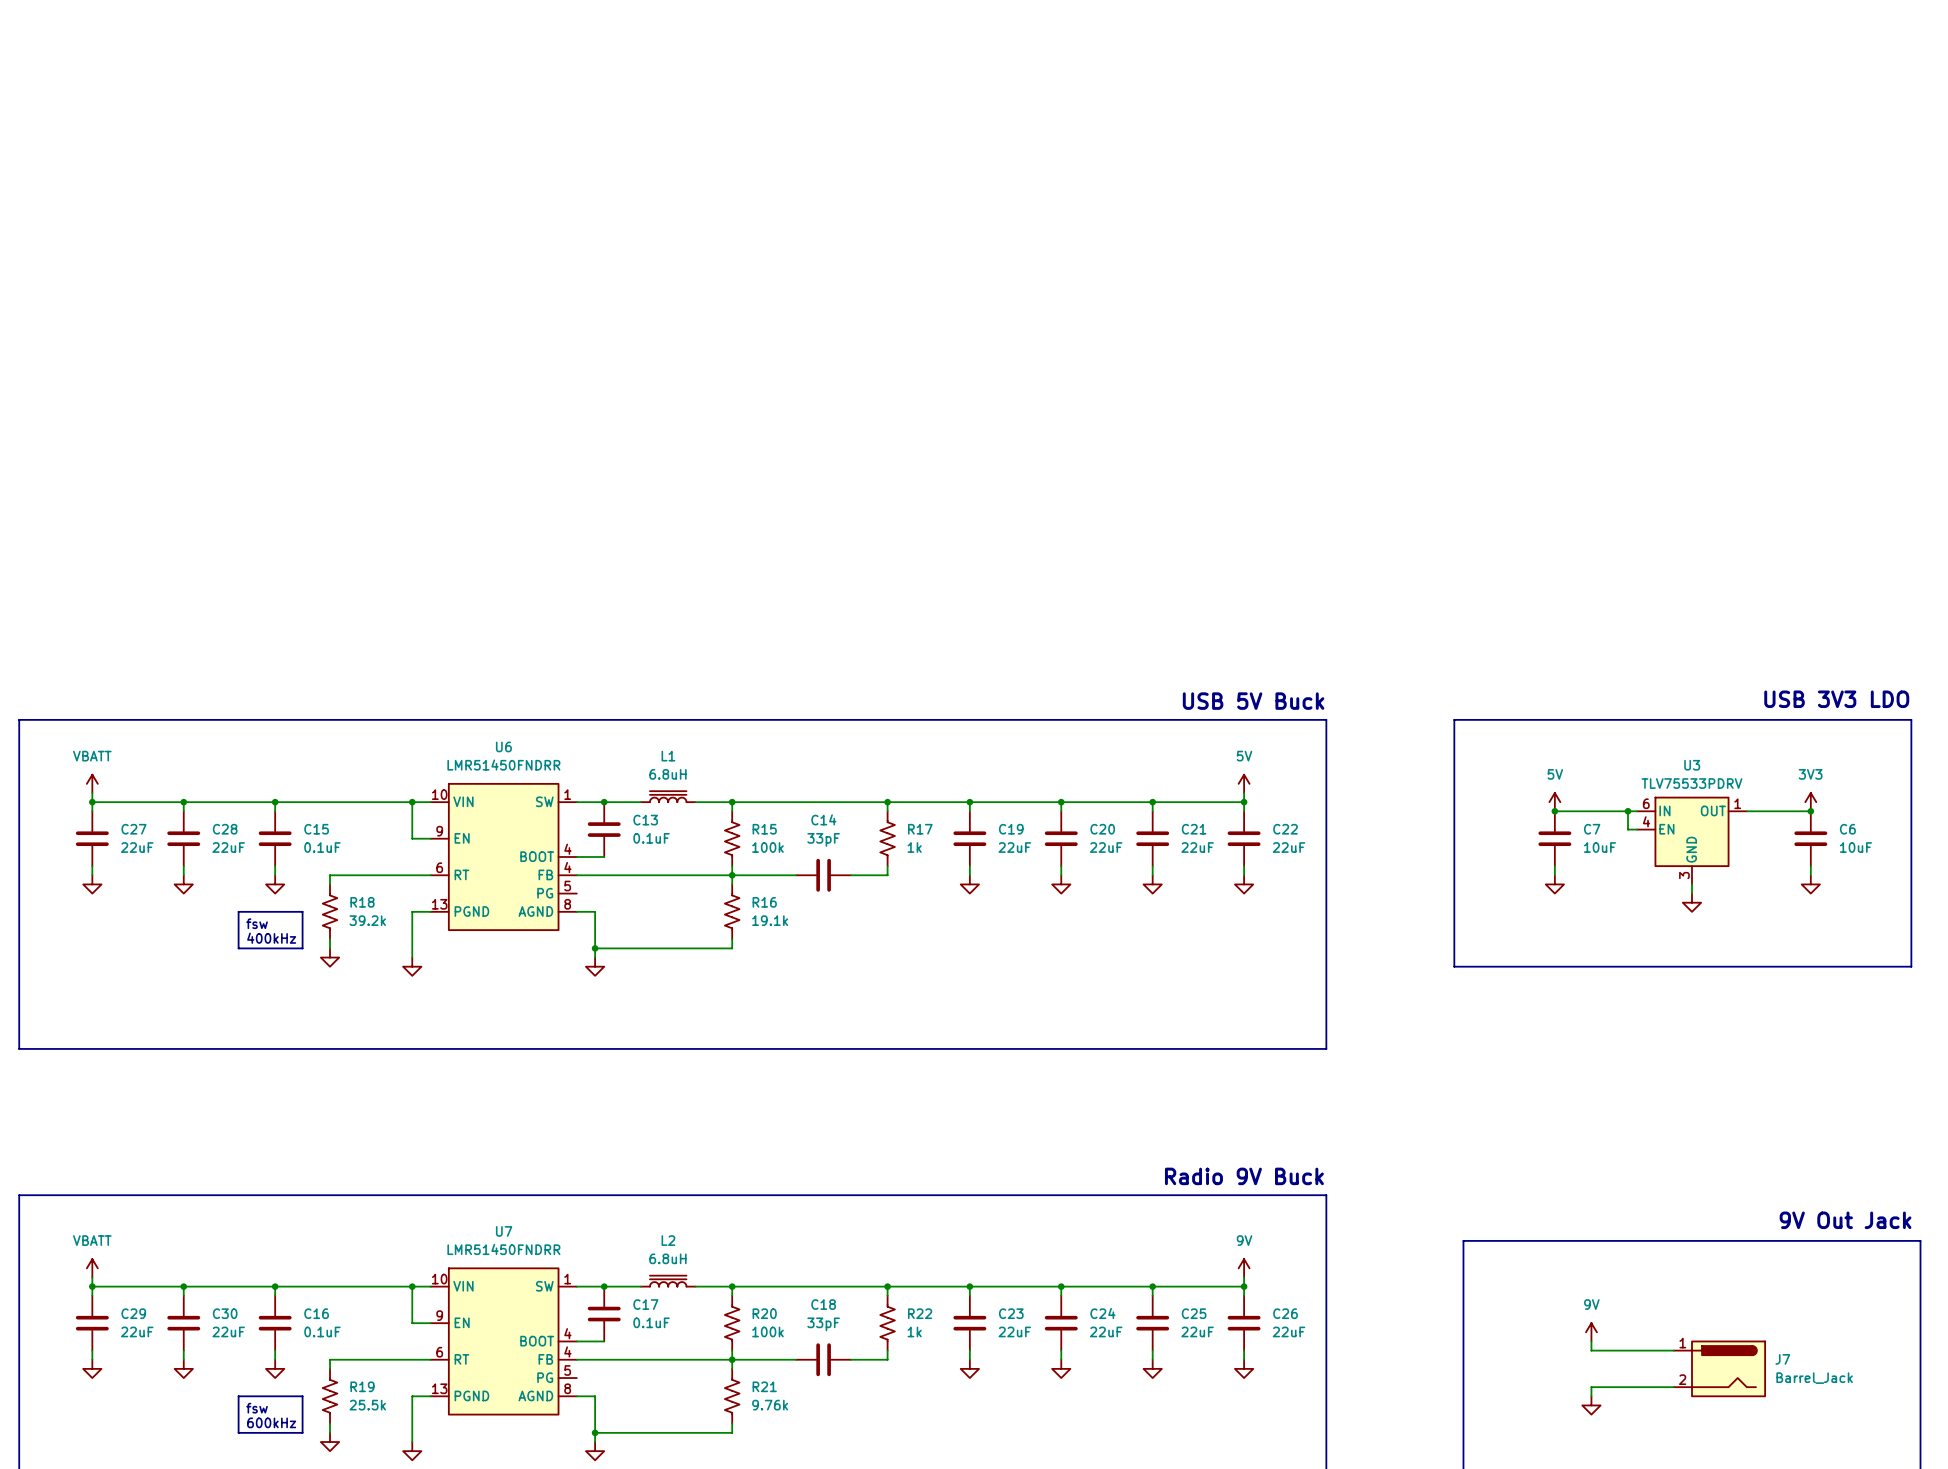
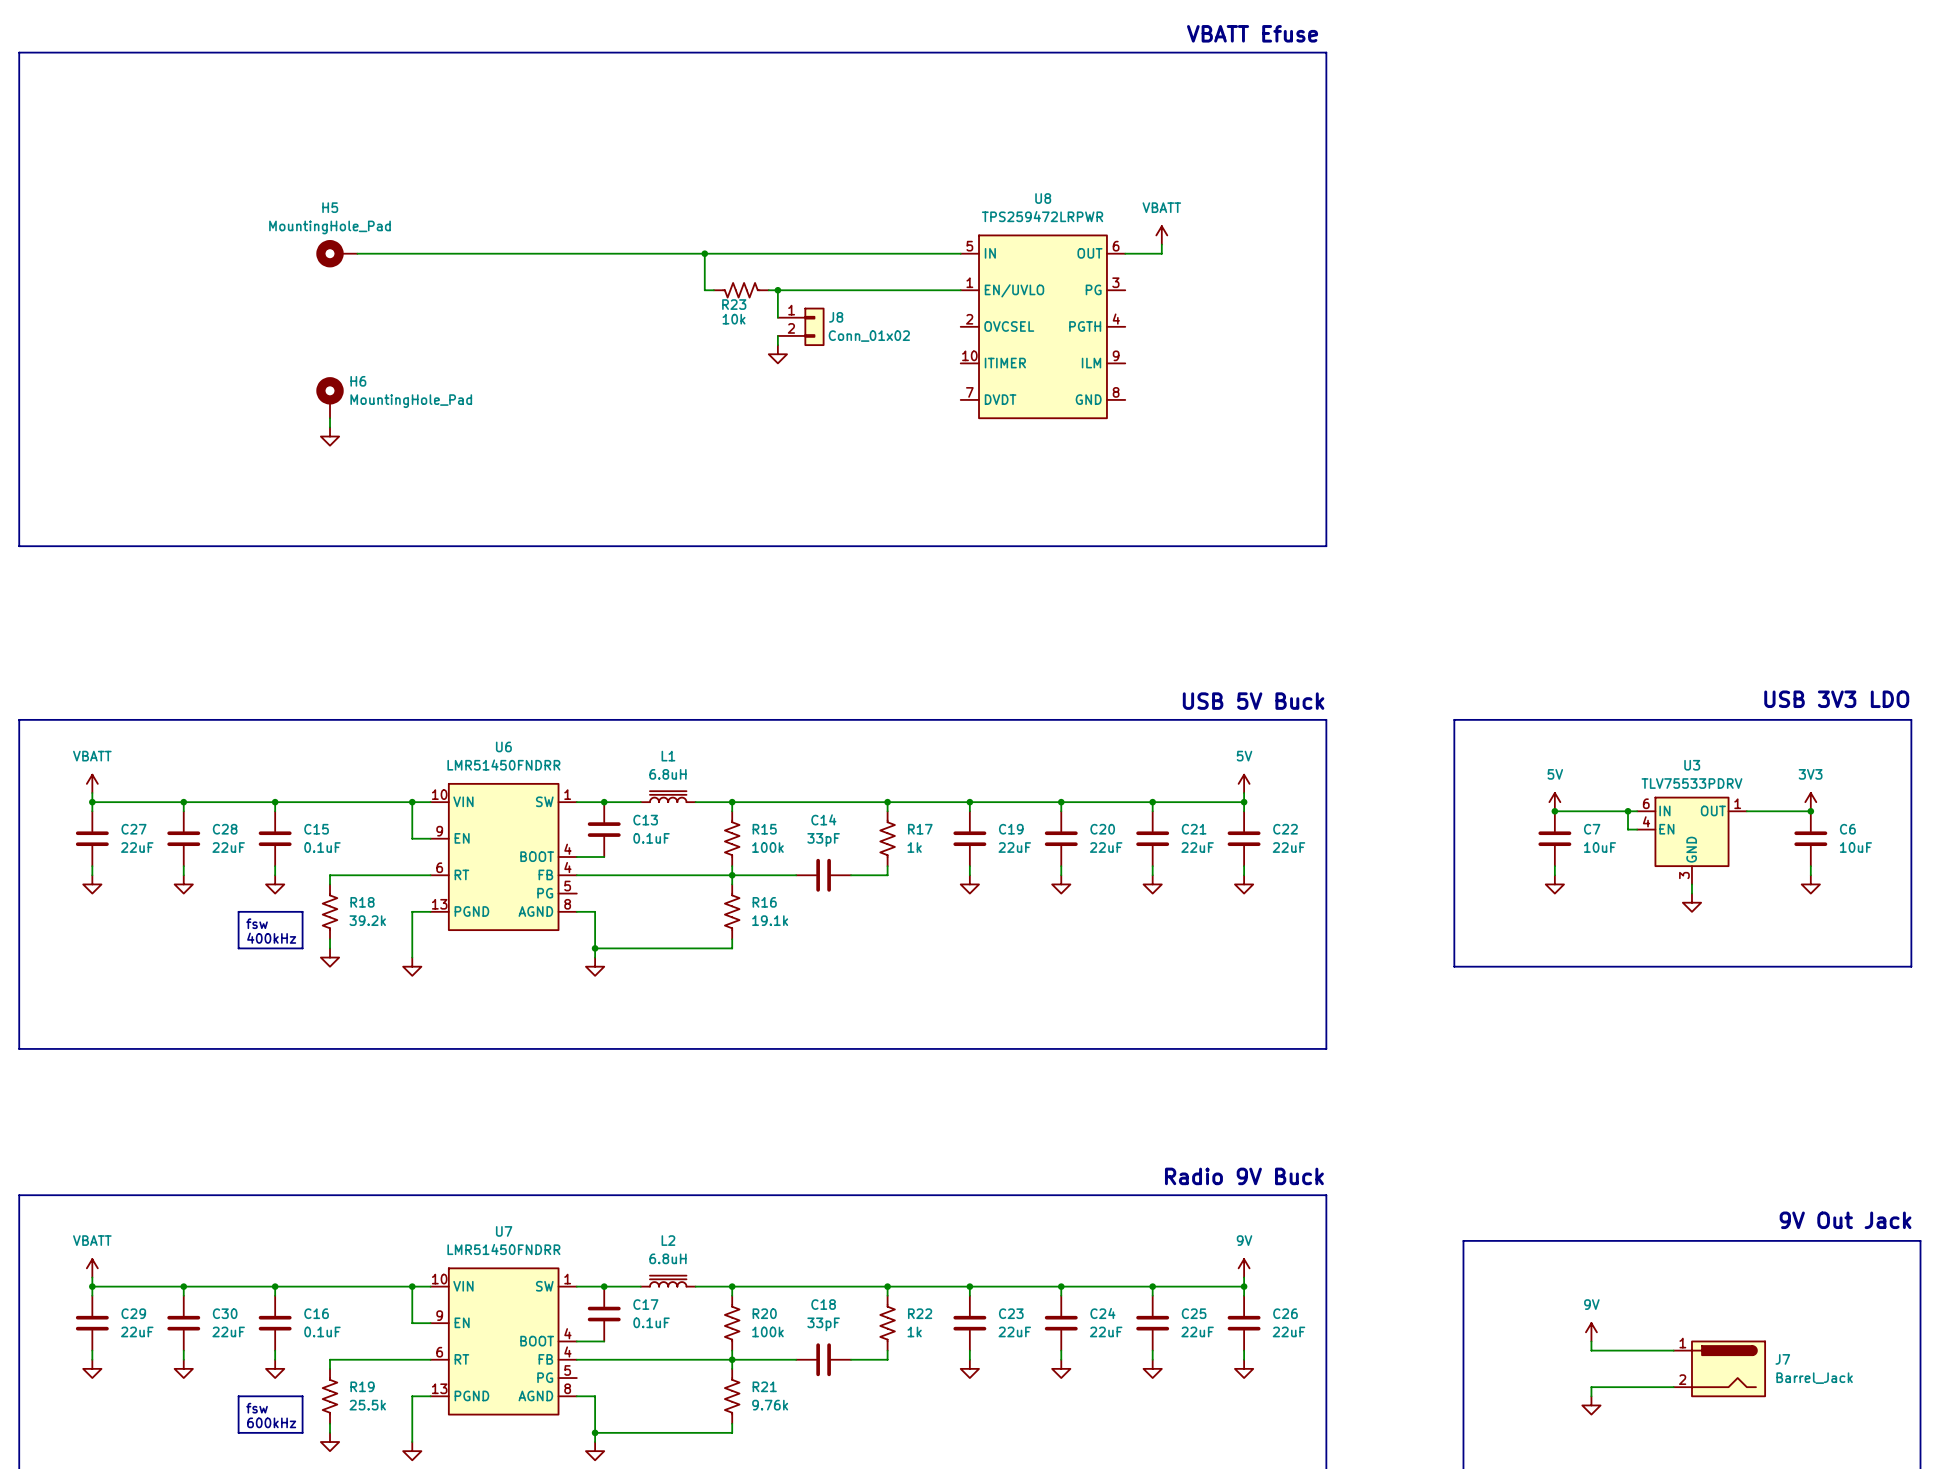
text: none -> VBATT Efuse (1252, 33)
line: none -> (19, 52) (1326, 52) (1326, 546) (19, 546) (19, 52)
power symbol: none -> VBATT (1161, 235)
wire: none -> (1161, 244) (1161, 253) (1125, 253)
H5: none -> MountingHole_Pad (336, 253)
wire: none -> (357, 253) (960, 253)
wire: none -> (704, 253) (704, 290) (713, 290)
junction: none -> (704, 253)
R23: none -> 10k (741, 290)
wire: none -> (768, 290) (960, 290)
wire: none -> (777, 290) (777, 317)
junction: none -> (777, 290)
J8: none -> Conn_01x02 (801, 326)
U8: none -> TPS259472LRPWR (1042, 326)
wire: none -> (777, 335) (777, 345)
power symbol: none -> (777, 354)
H6: none -> MountingHole_Pad (330, 397)
wire: none -> (330, 418) (330, 427)
power symbol: none -> (330, 436)

